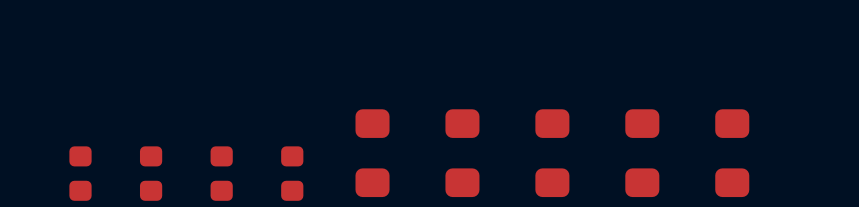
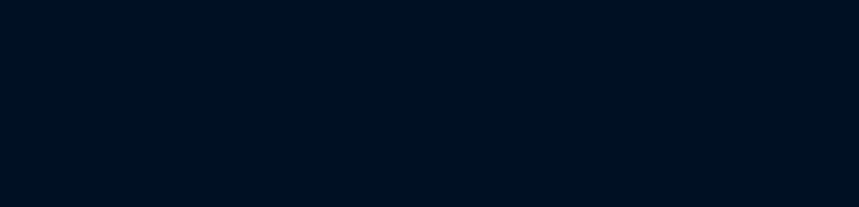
part: (372, 153) -> none
part: (462, 153) -> none
part: (552, 153) -> none
part: (642, 153) -> none
part: (732, 153) -> none
part: (80, 173) -> none
part: (151, 173) -> none
part: (221, 173) -> none
part: (292, 173) -> none

